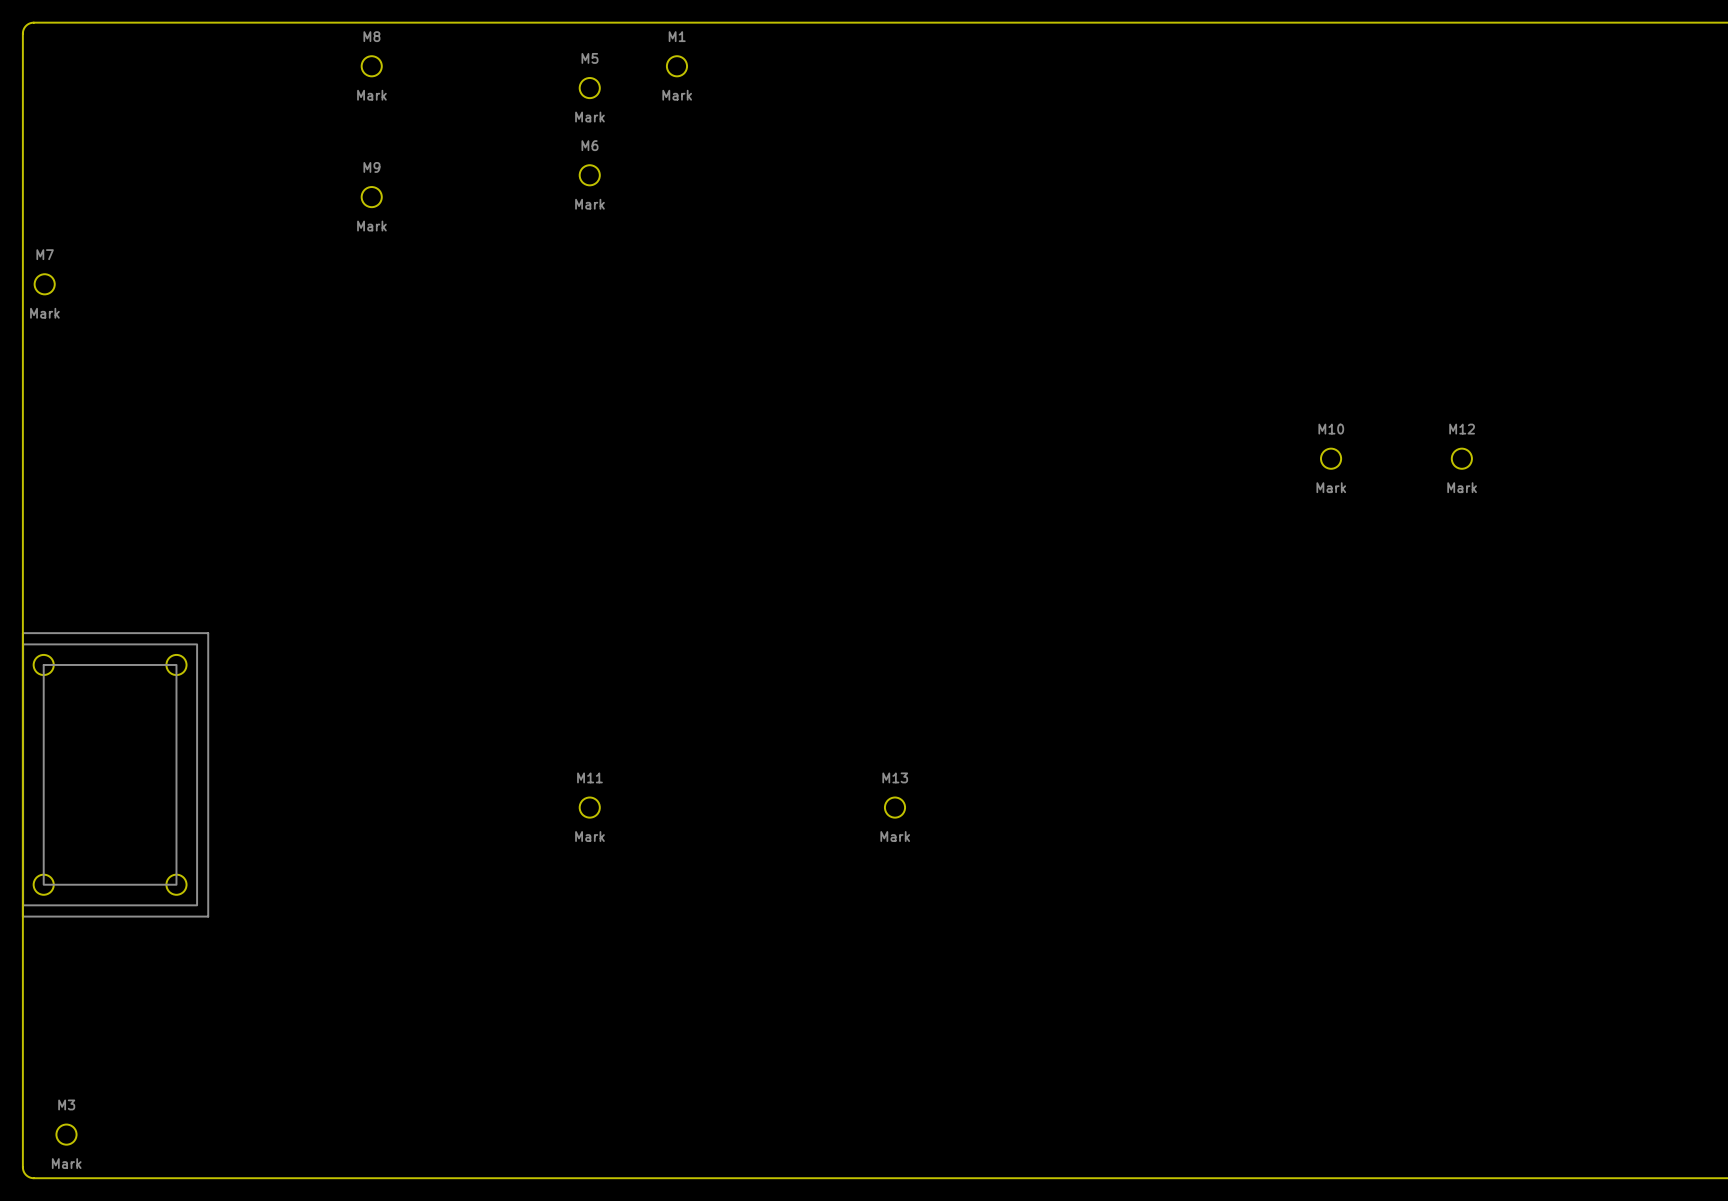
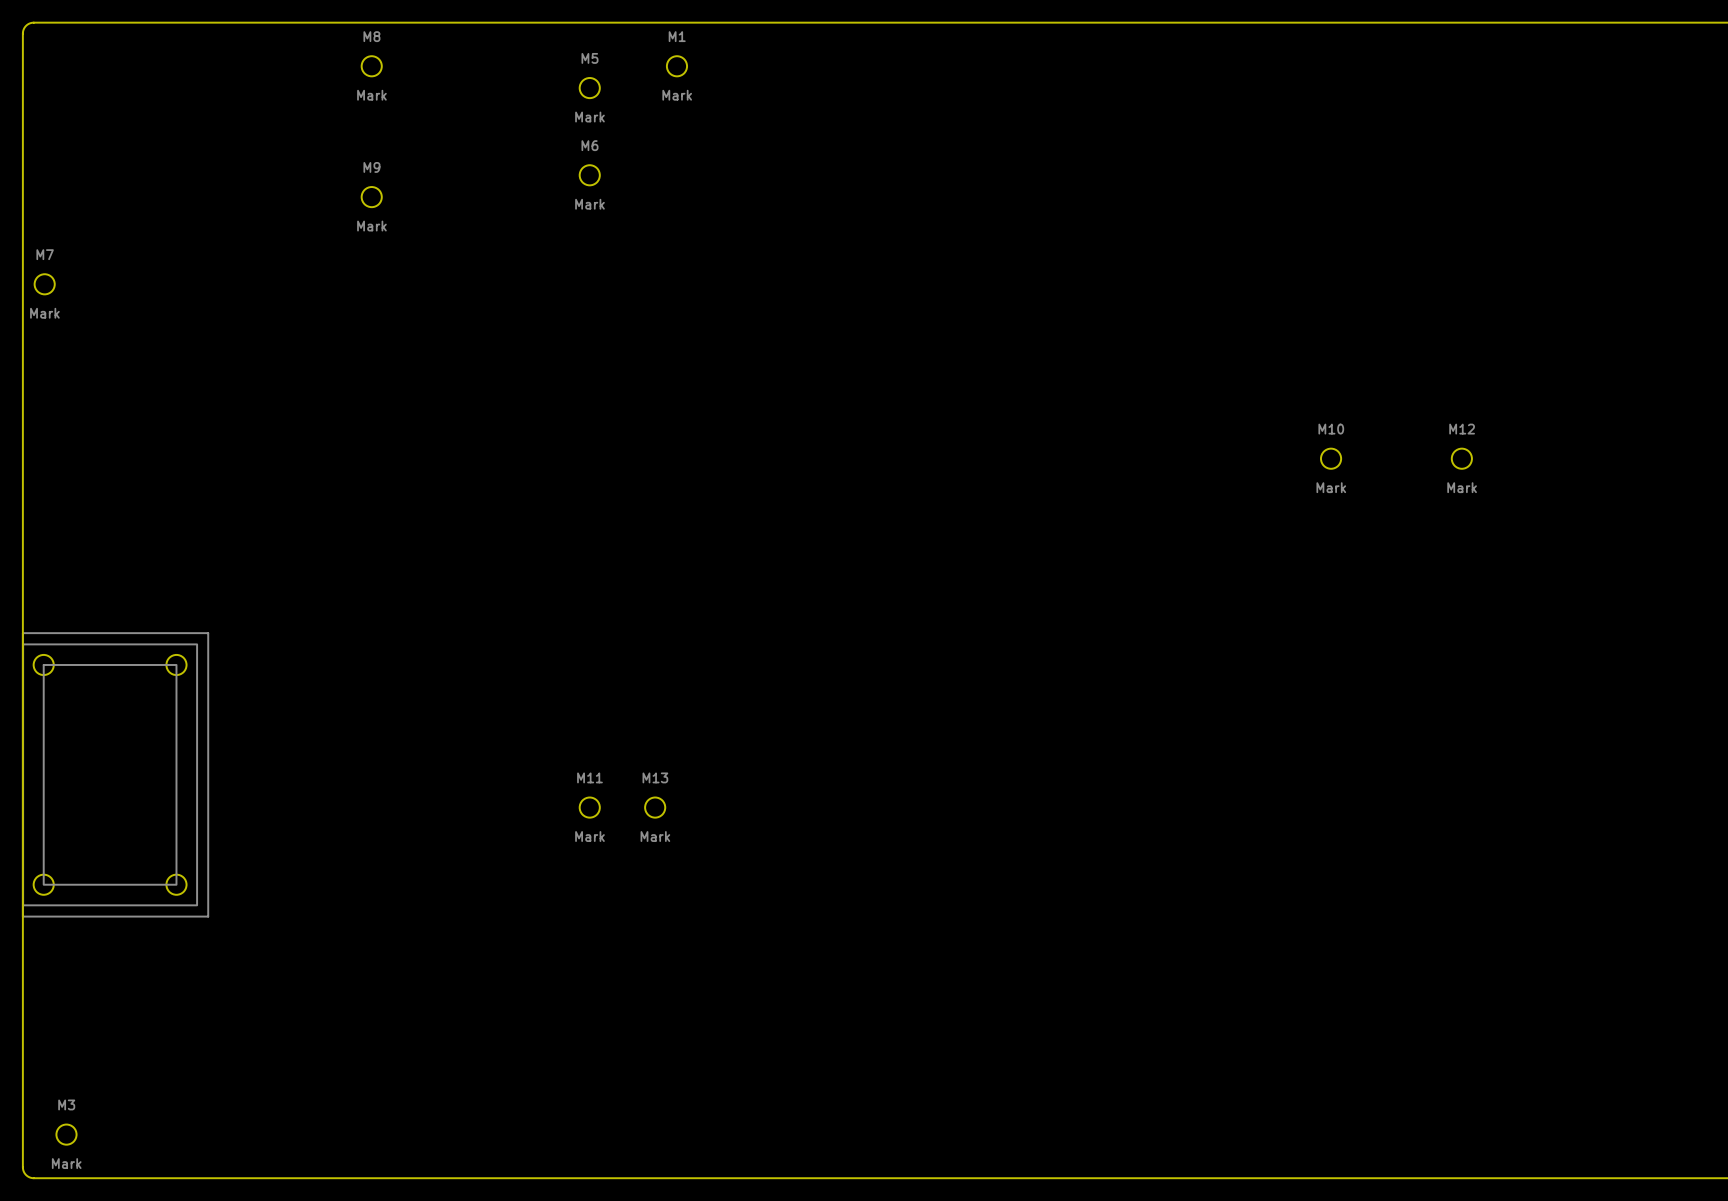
M13 position: (895, 807) -> (655, 807)

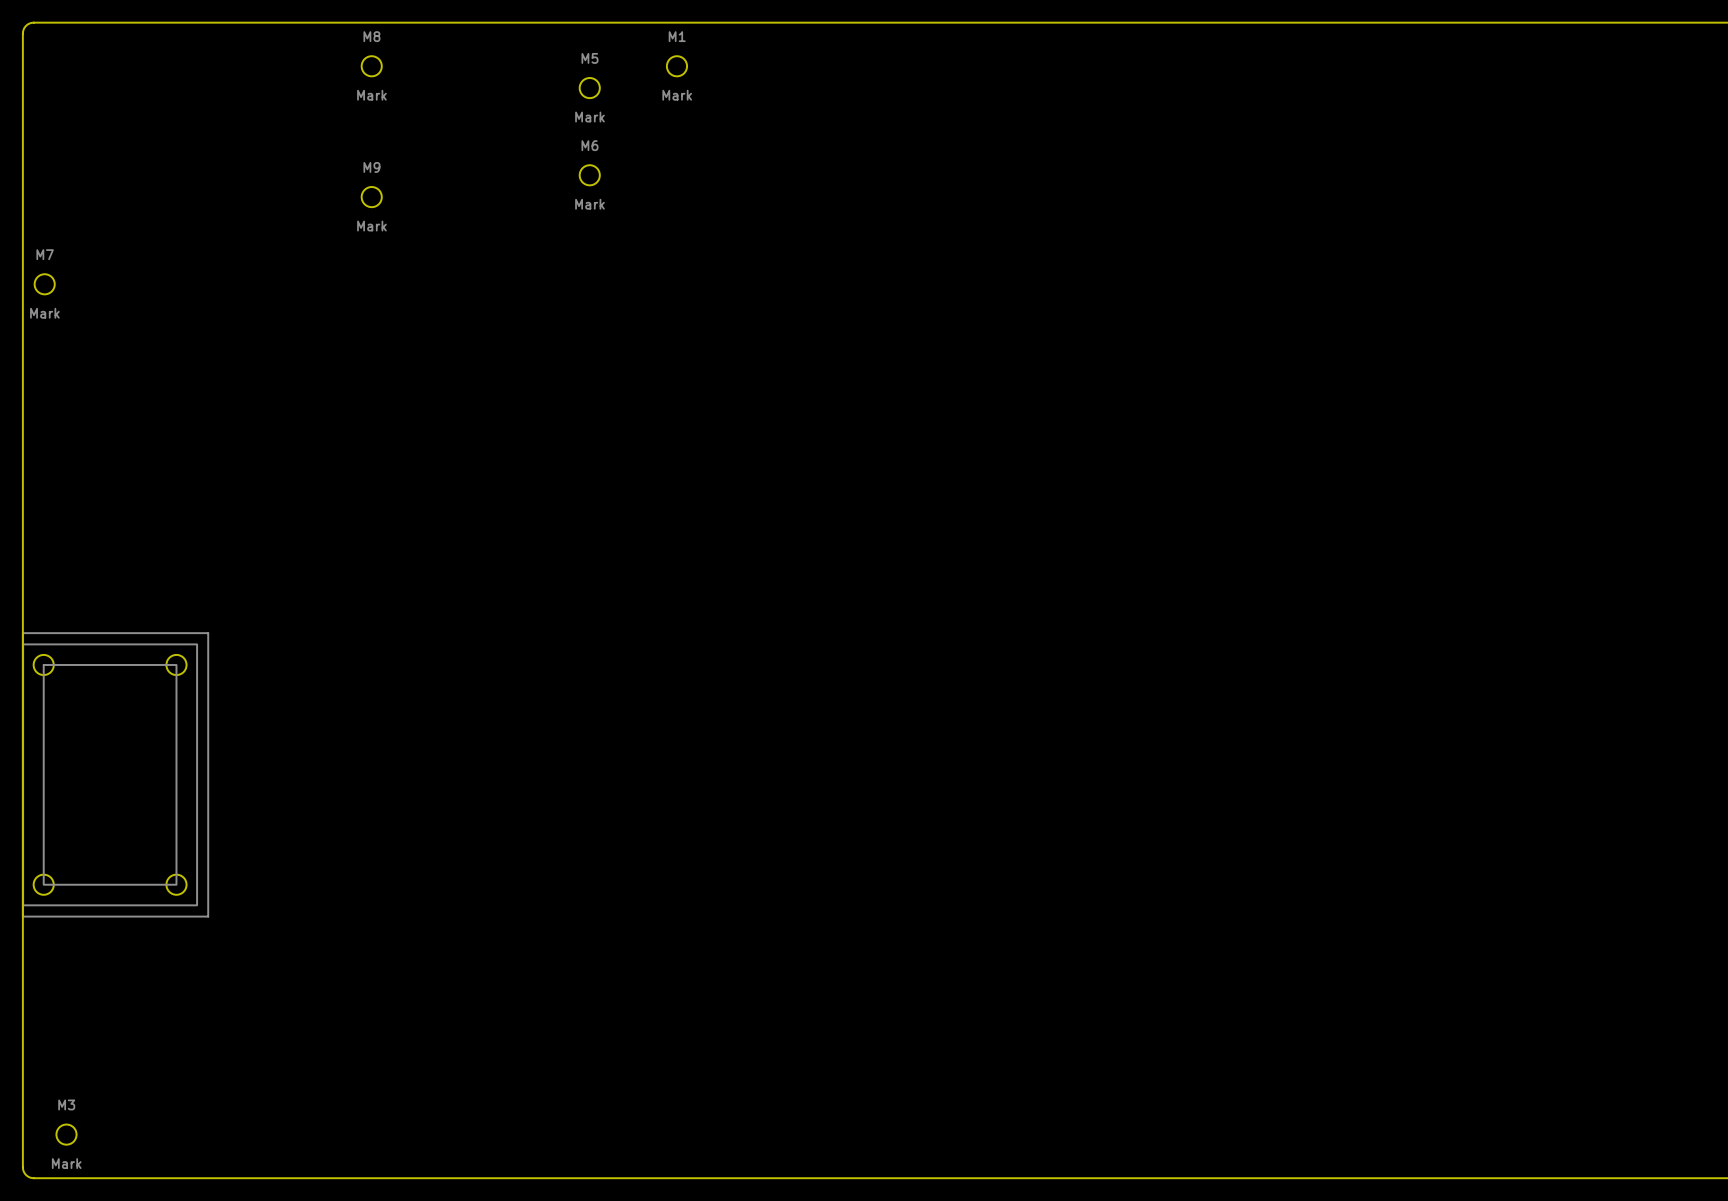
M10: Mark (1331, 458) -> none
M12: Mark (1461, 458) -> none
M11: Mark (589, 807) -> none
M13: Mark (655, 807) -> none

